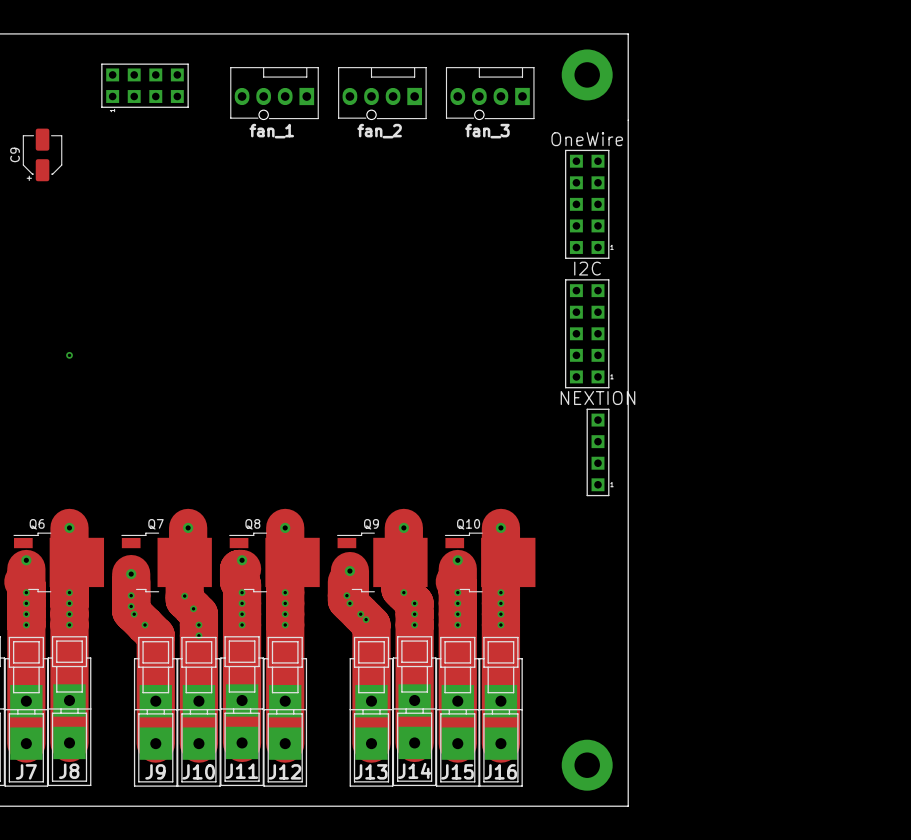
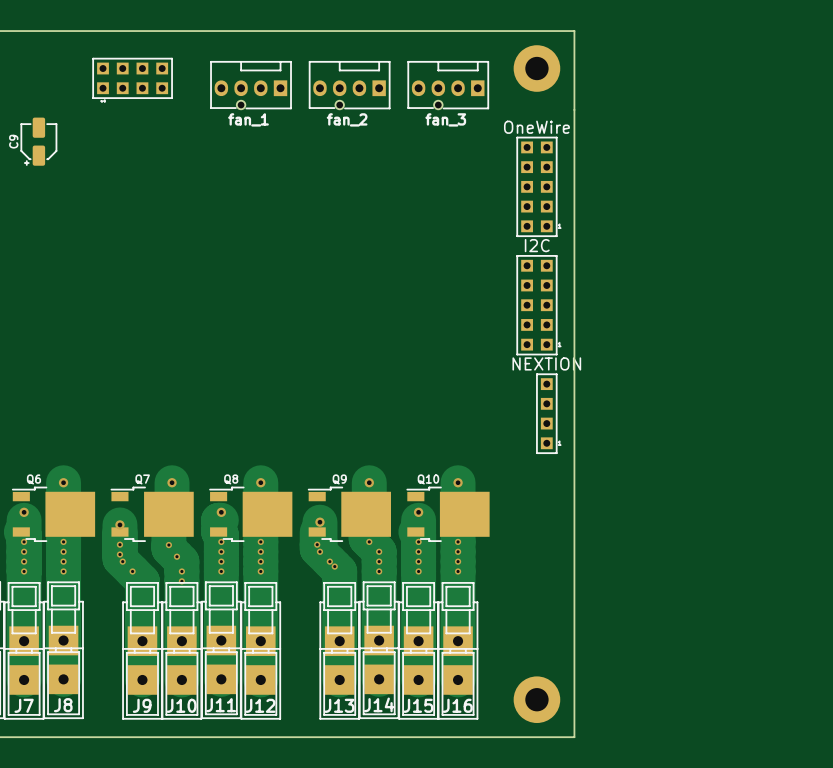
via: (69, 355) -> none

